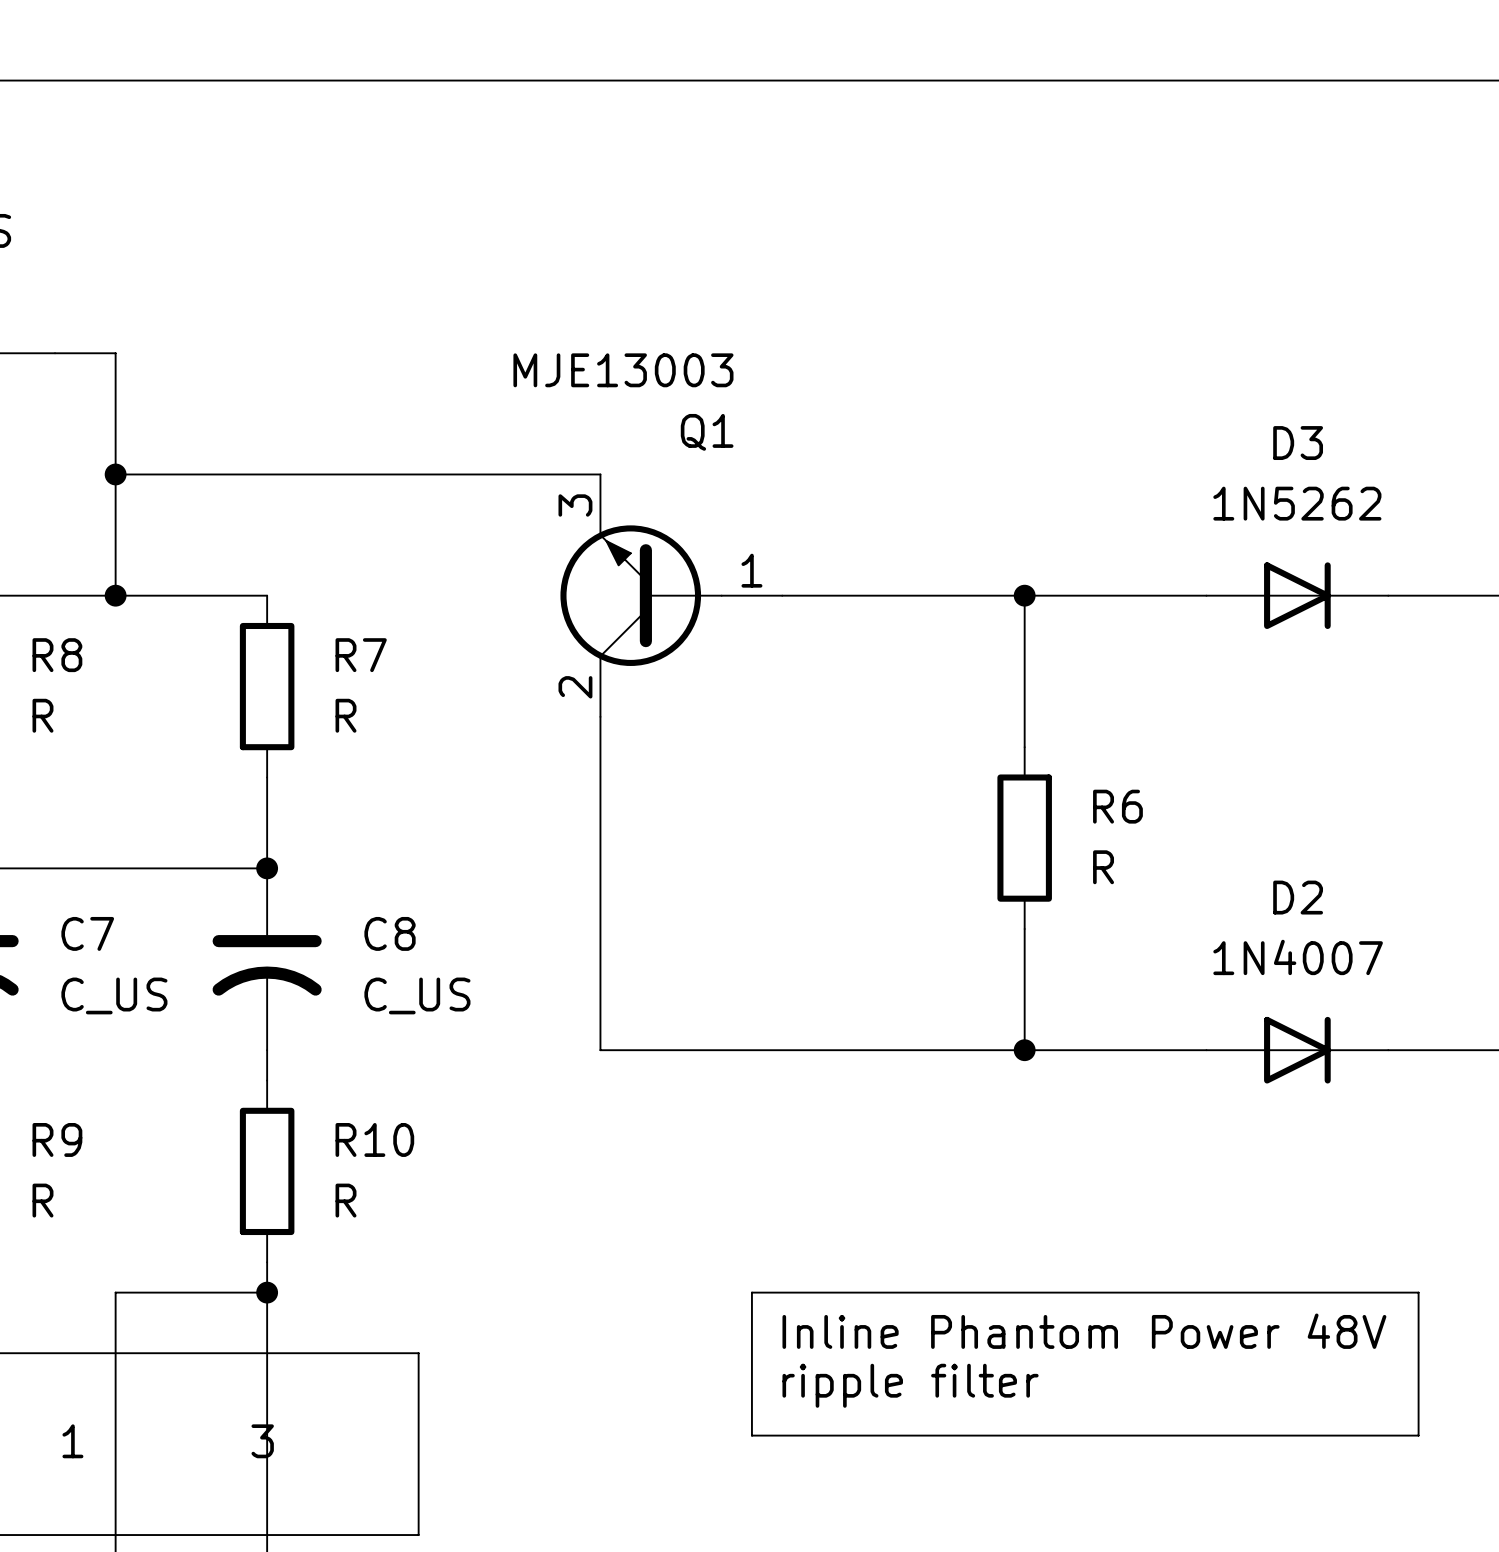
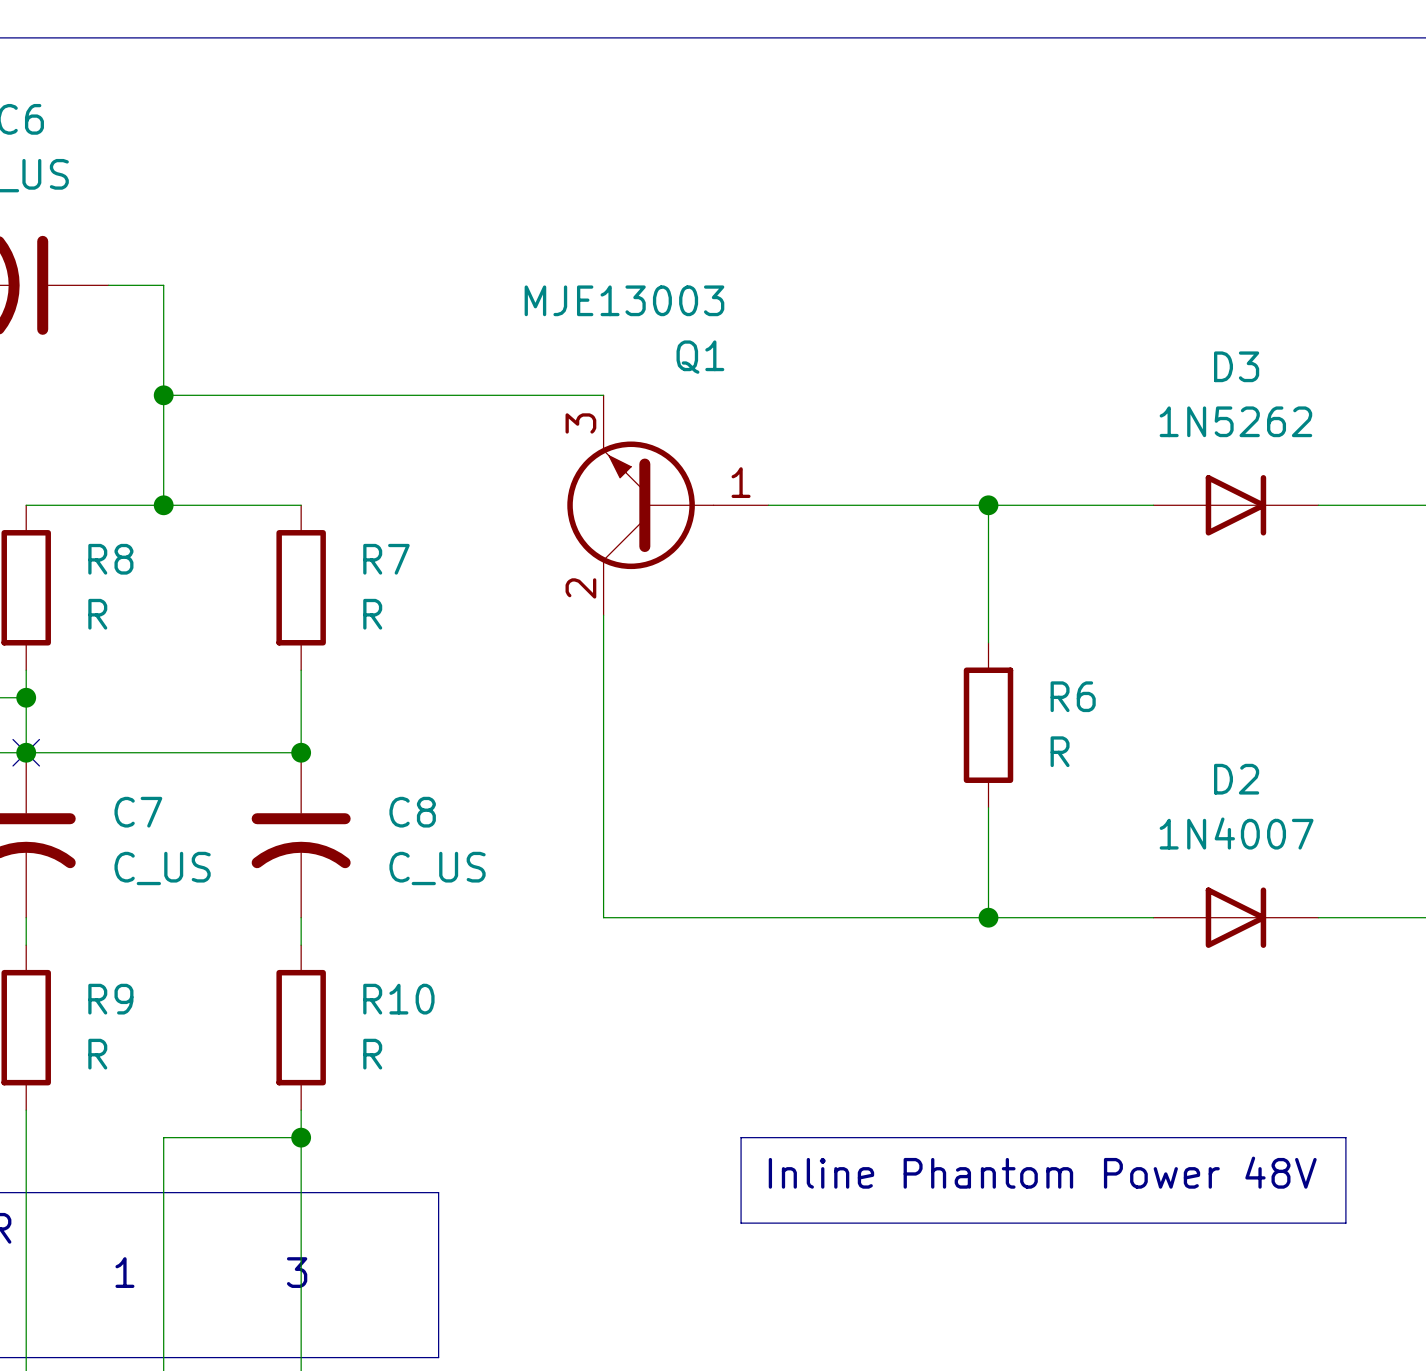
text: ripple filter (910, 1385) -> none
line: (751, 1386) (751, 1435) (1418, 1435) (1418, 1386) -> (741, 1223) (1345, 1223)

